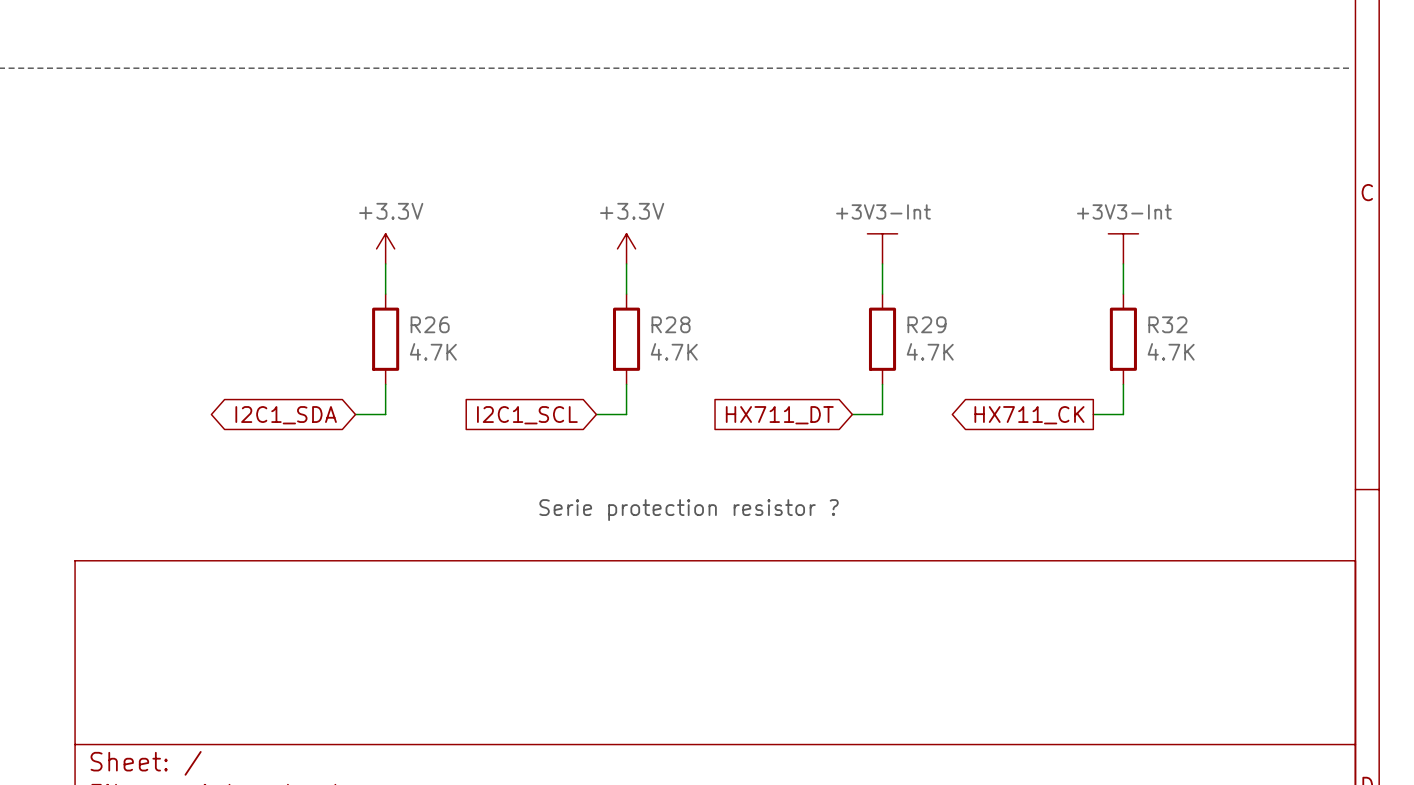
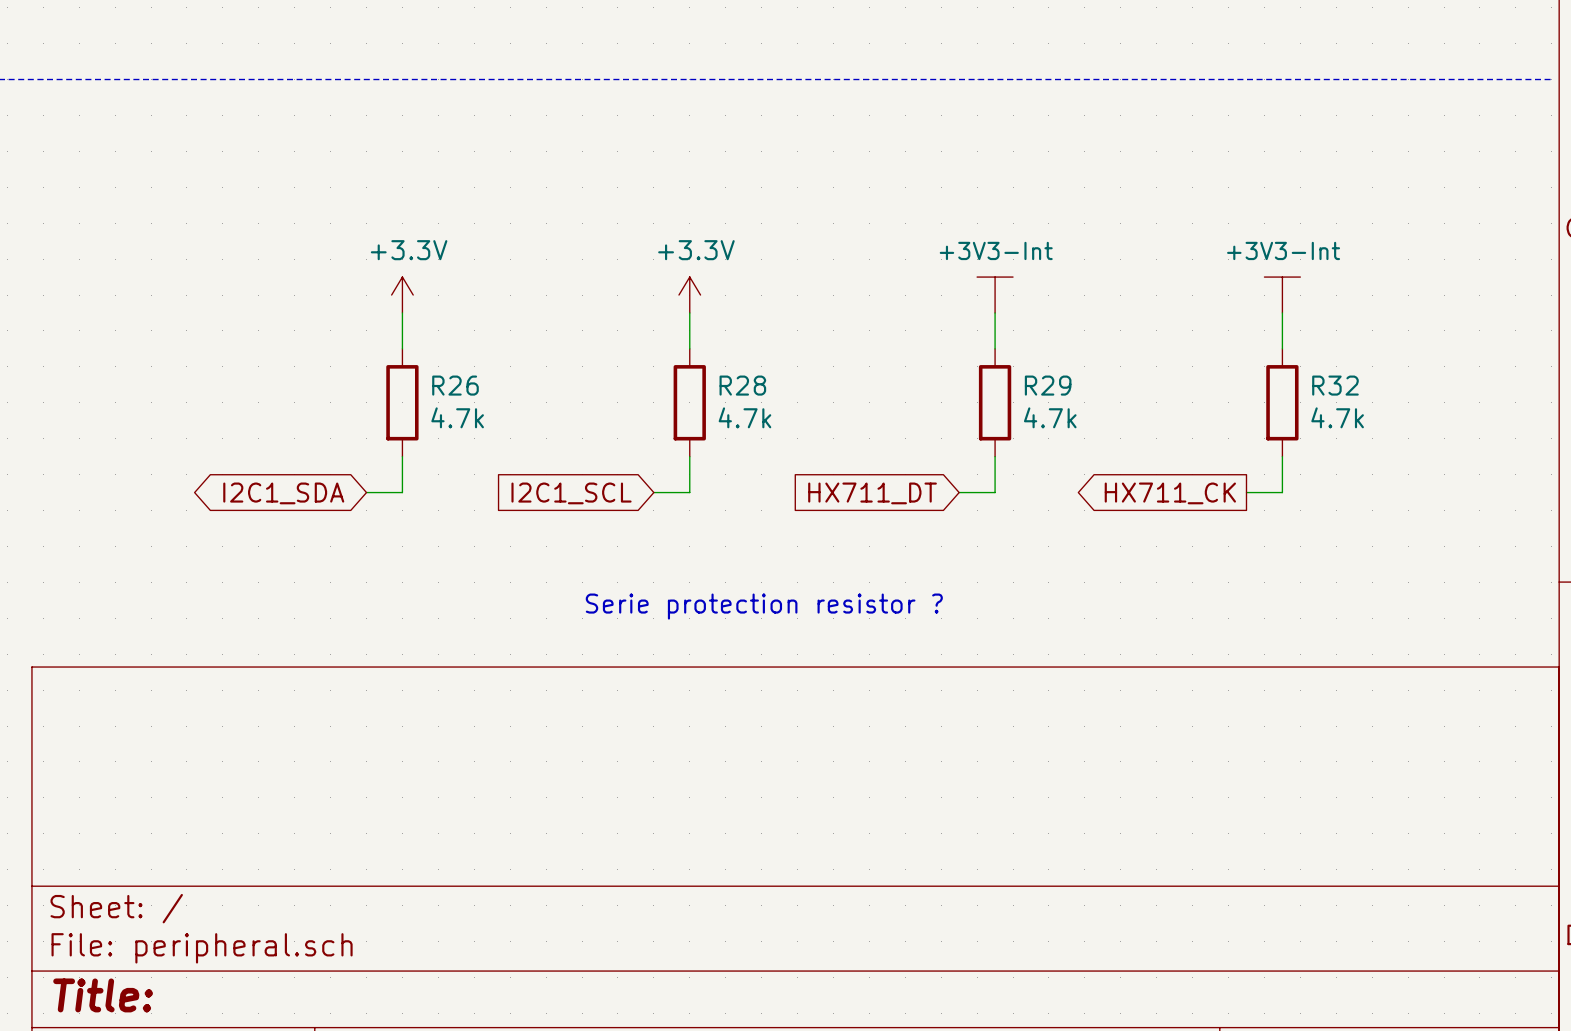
R26 value: 4.7K (433, 351) -> 4.7k (457, 417)
R28 value: 4.7K (674, 351) -> 4.7k (744, 417)
R29 value: 4.7K (930, 351) -> 4.7k (1050, 417)
R32 value: 4.7K (1171, 351) -> 4.7k (1337, 417)

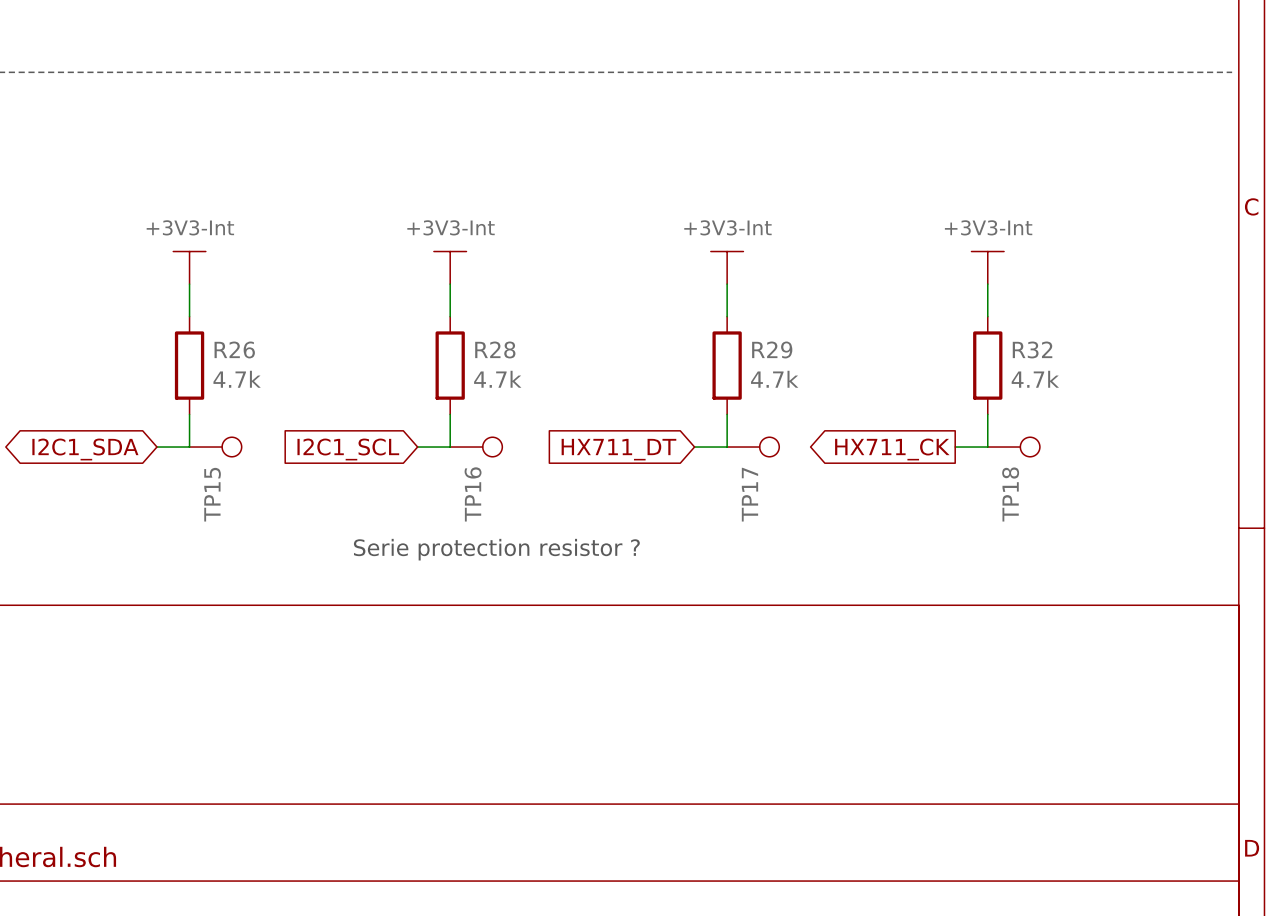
power symbol: +3.3V (402, 295) -> +3V3-Int (189, 267)
power symbol: +3.3V (689, 295) -> +3V3-Int (450, 267)
TP15: none -> (215, 447)
TP16: none -> (476, 447)
TP17: none -> (753, 447)
TP18: none -> (1013, 447)

